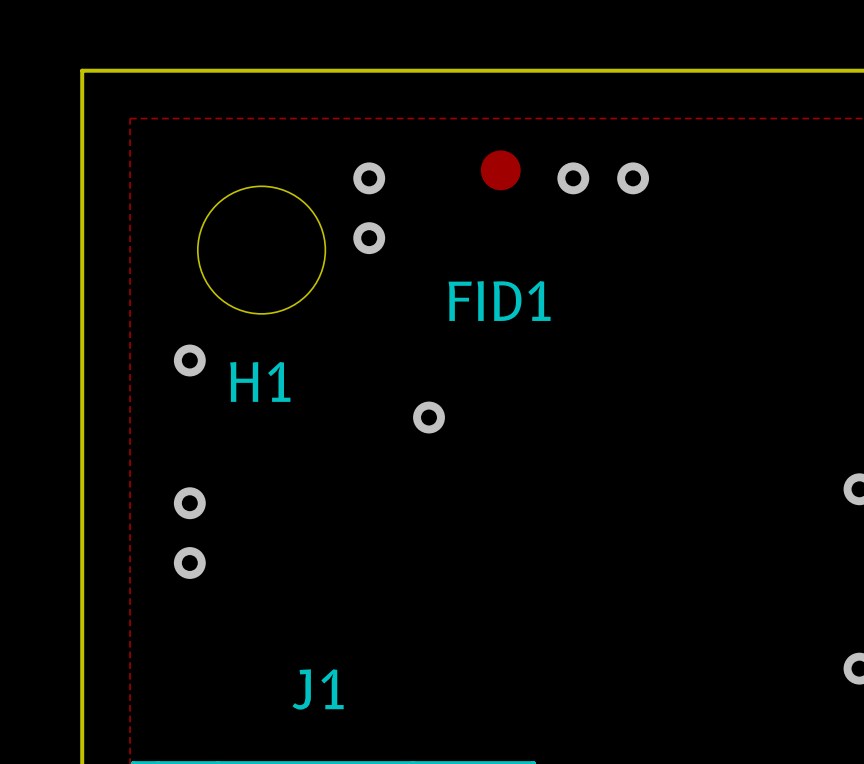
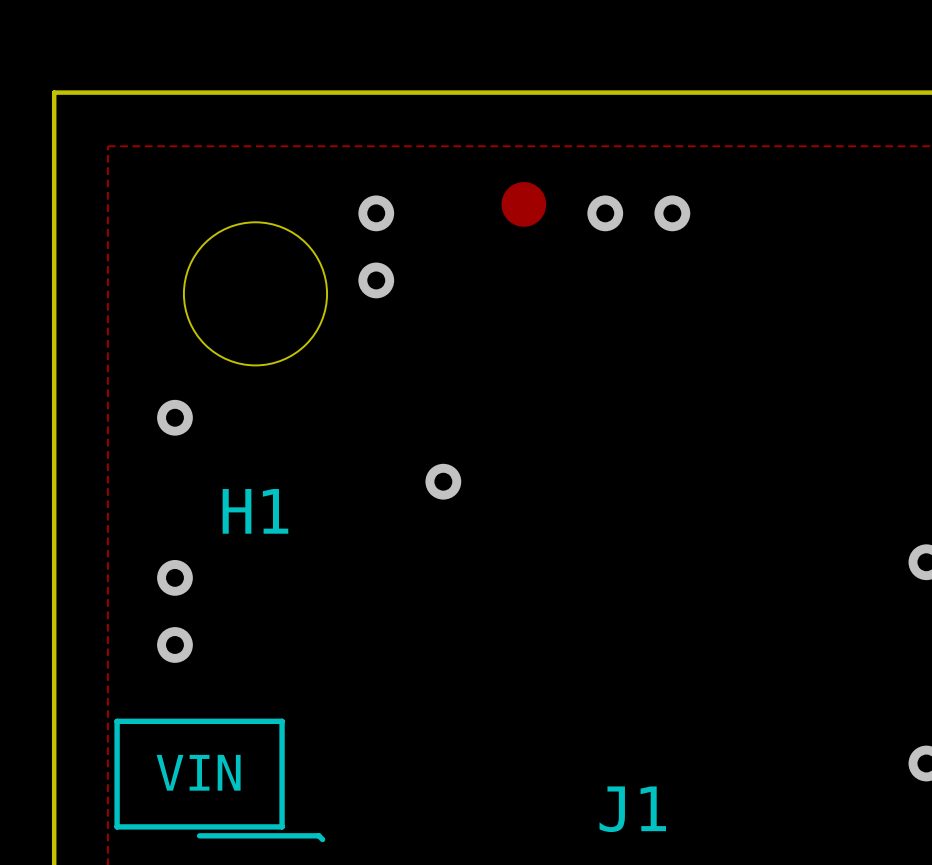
FID1 name: FID1 (499, 301) -> none
H1 name position: H1 (260, 381) -> H1 (255, 511)
line: none -> (117, 721) (282, 721) (282, 826) (117, 826) (117, 721)
text: none -> VIN (198, 772)
J1 name position: J1 (318, 689) -> J1 (632, 809)
line: none -> (199, 835) (318, 835) (322, 839)

